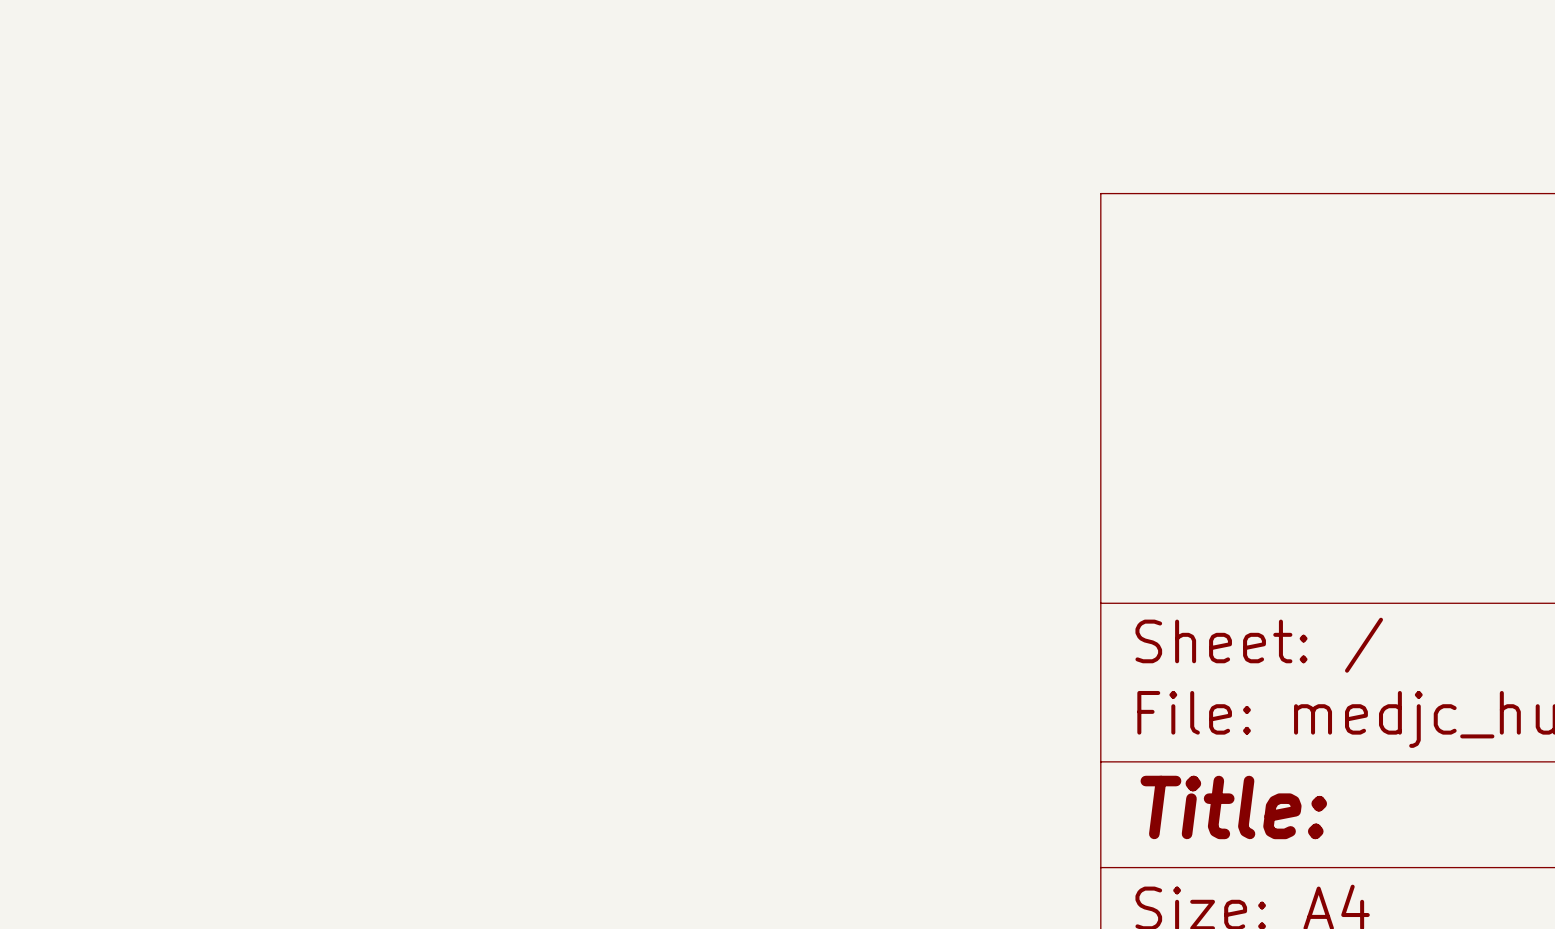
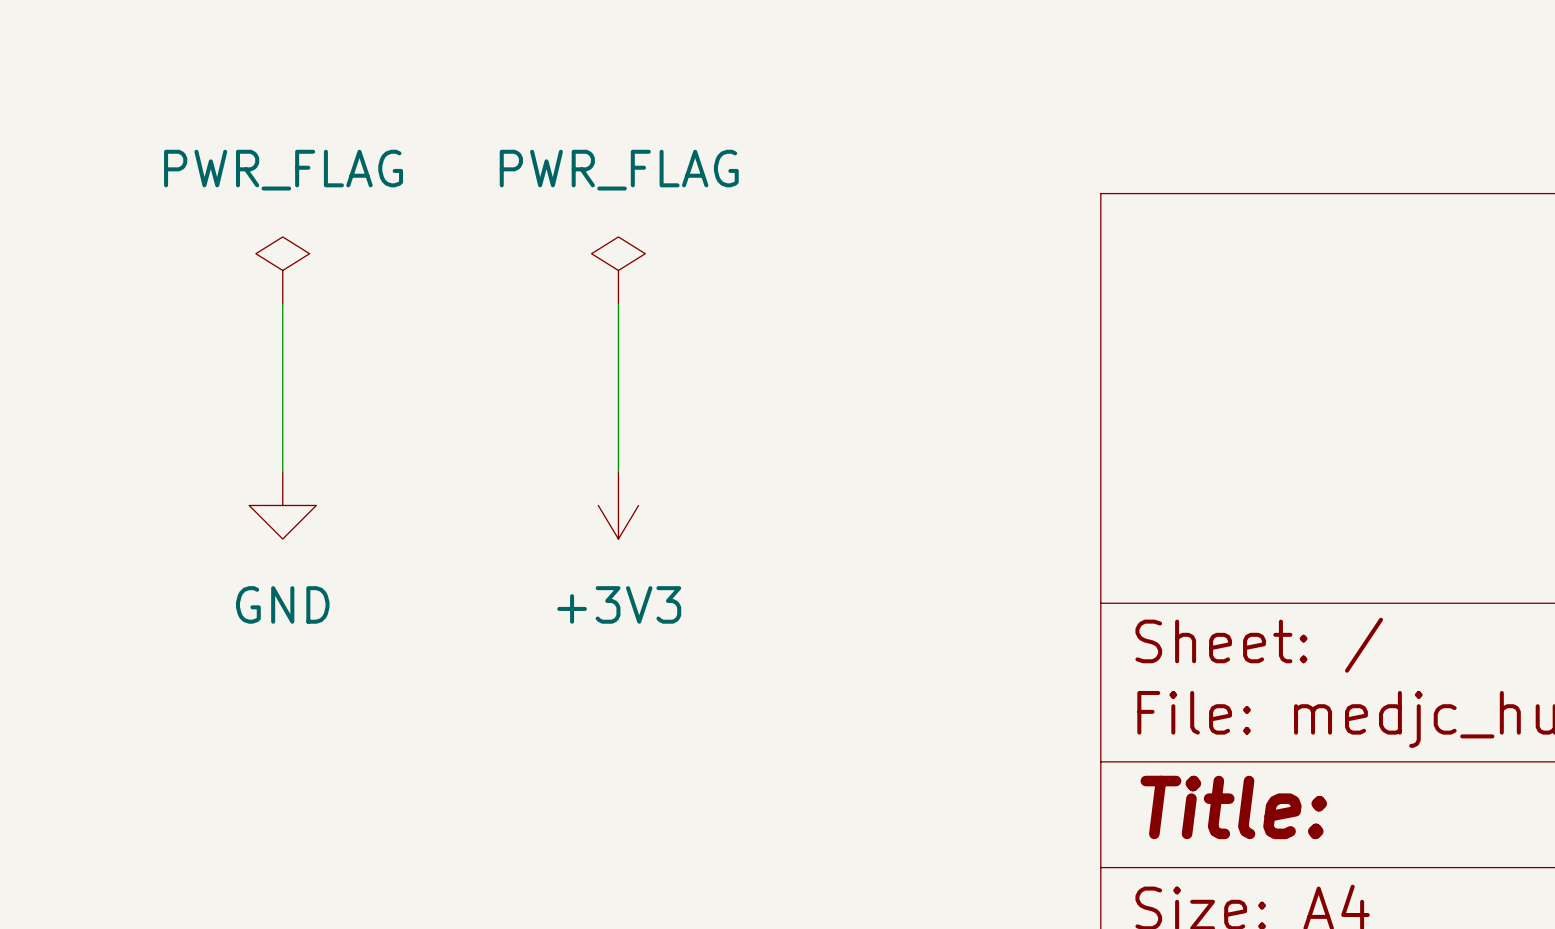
power symbol: none -> PWR_FLAG (282, 270)
power symbol: none -> PWR_FLAG (618, 270)
wire: none -> (282, 304) (282, 471)
wire: none -> (618, 304) (618, 471)
power symbol: none -> GND (282, 505)
power symbol: none -> +3V3 (618, 505)

